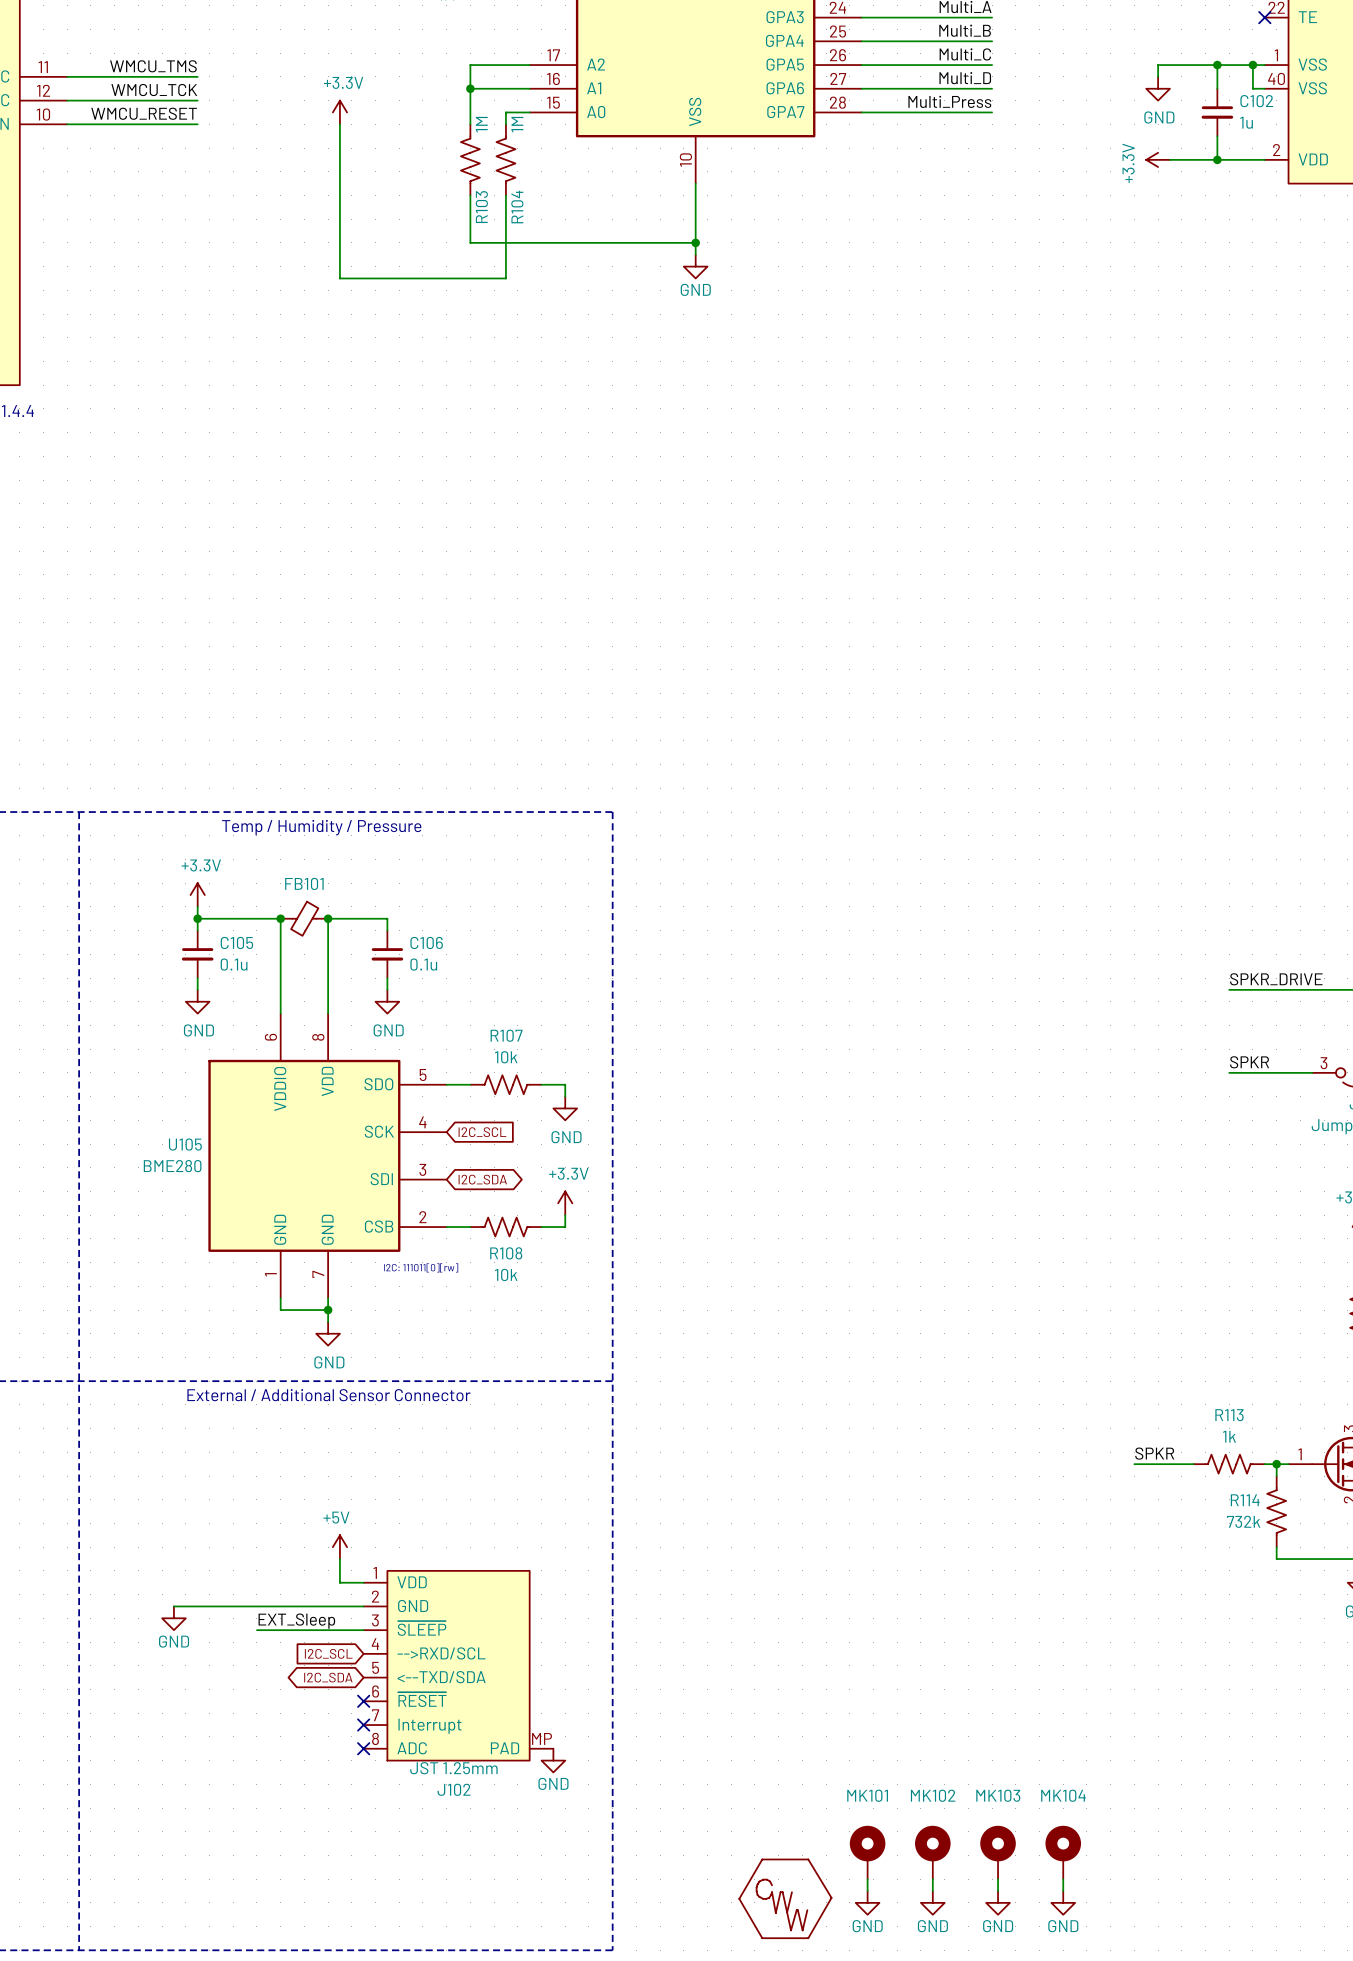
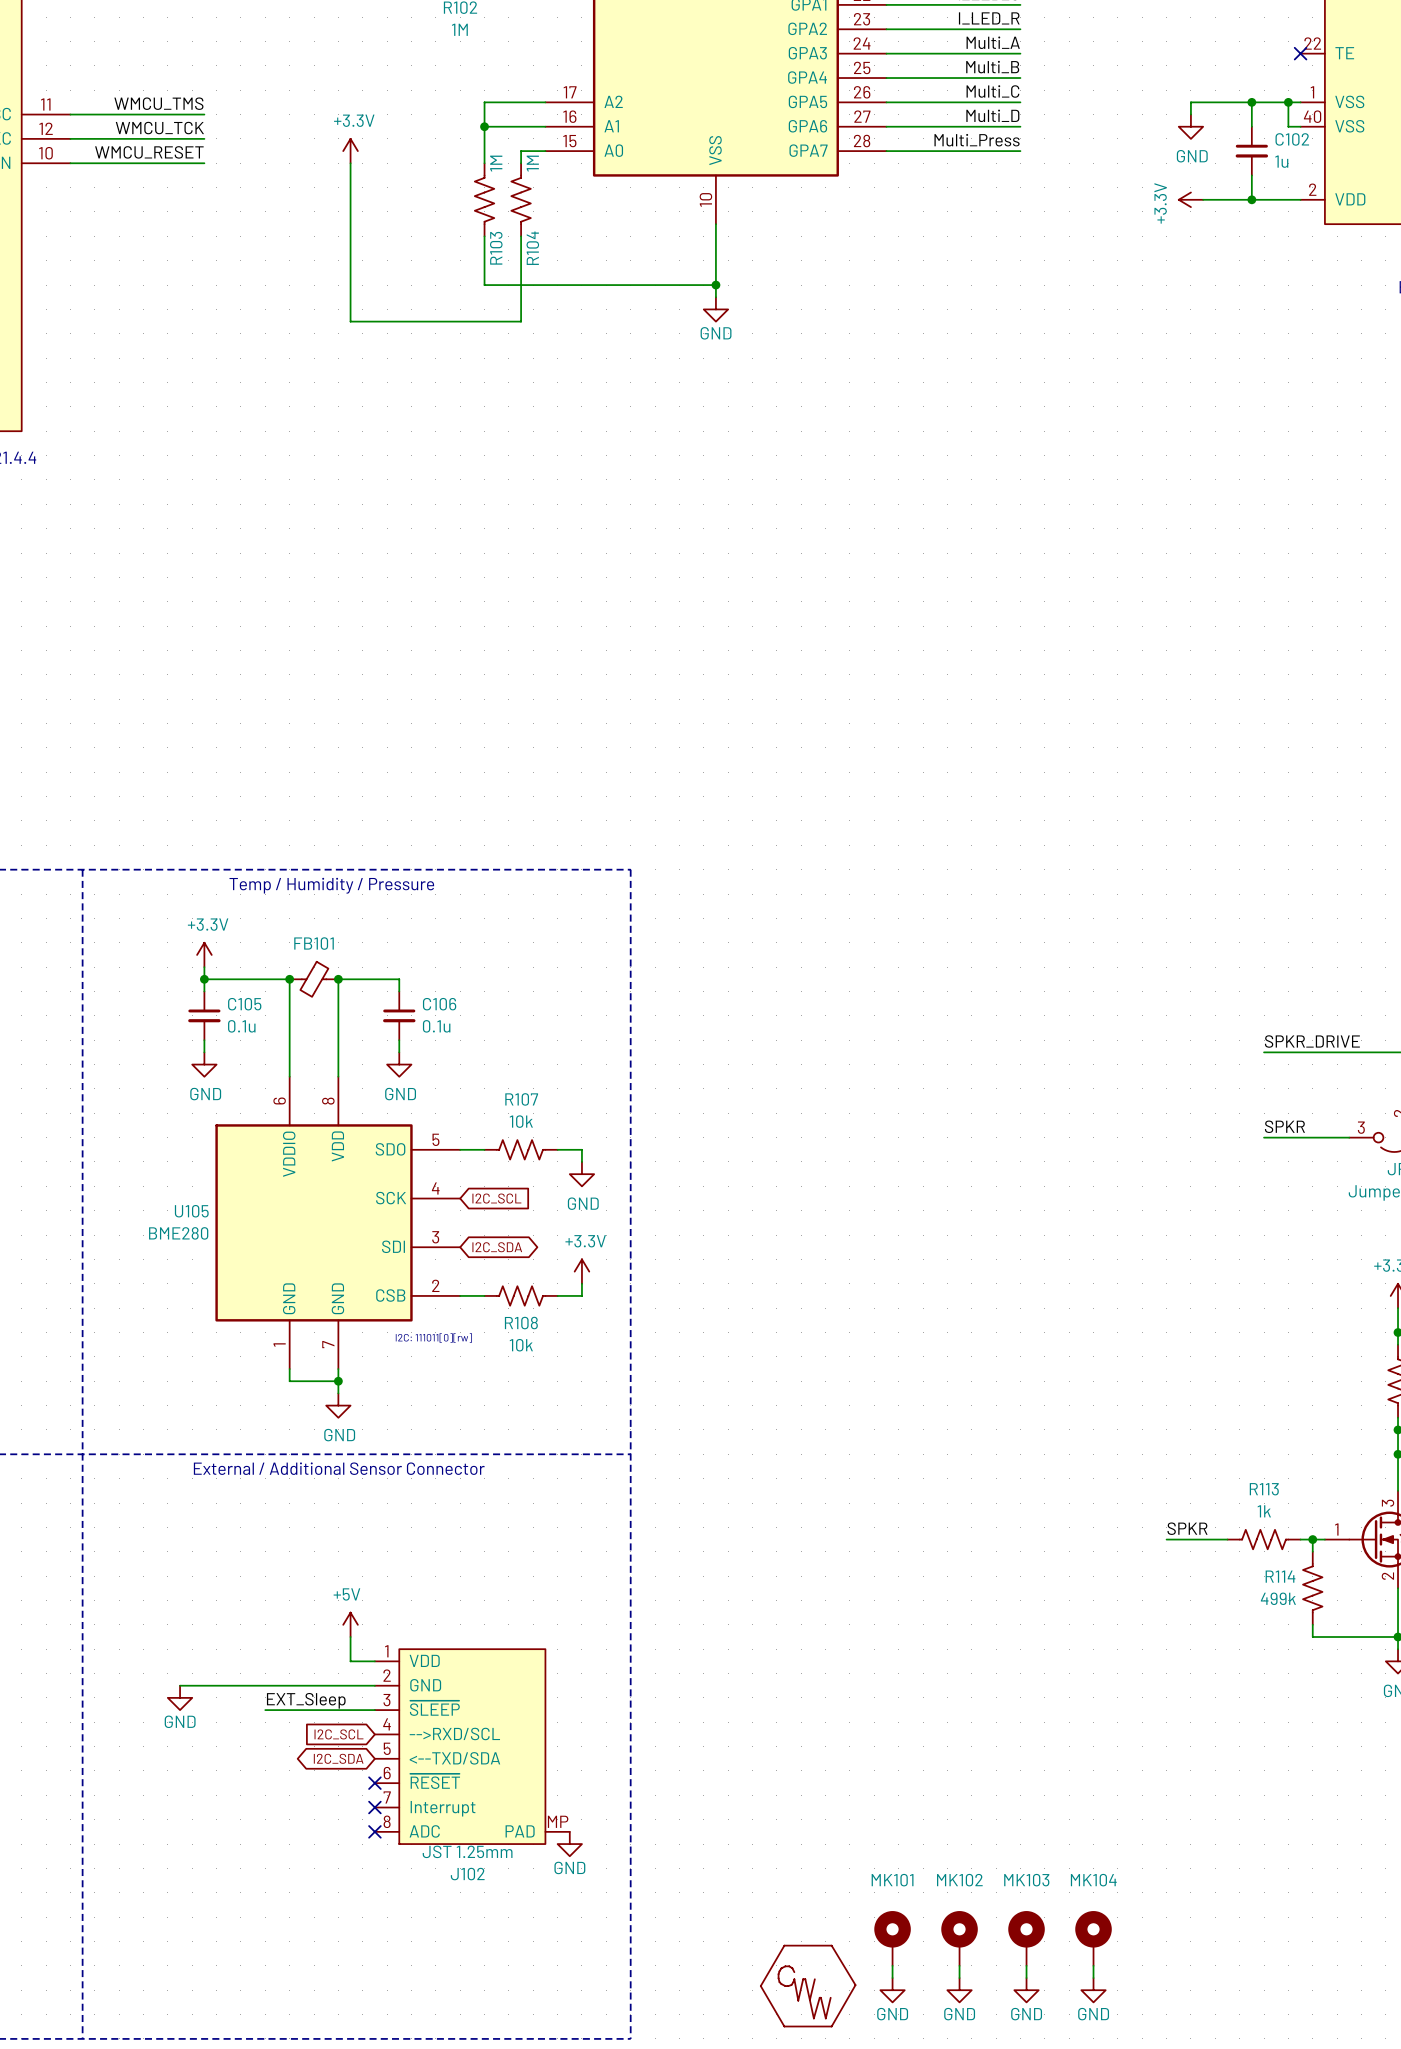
R114 value: 732k (1243, 1521) -> 499k (1278, 1598)

